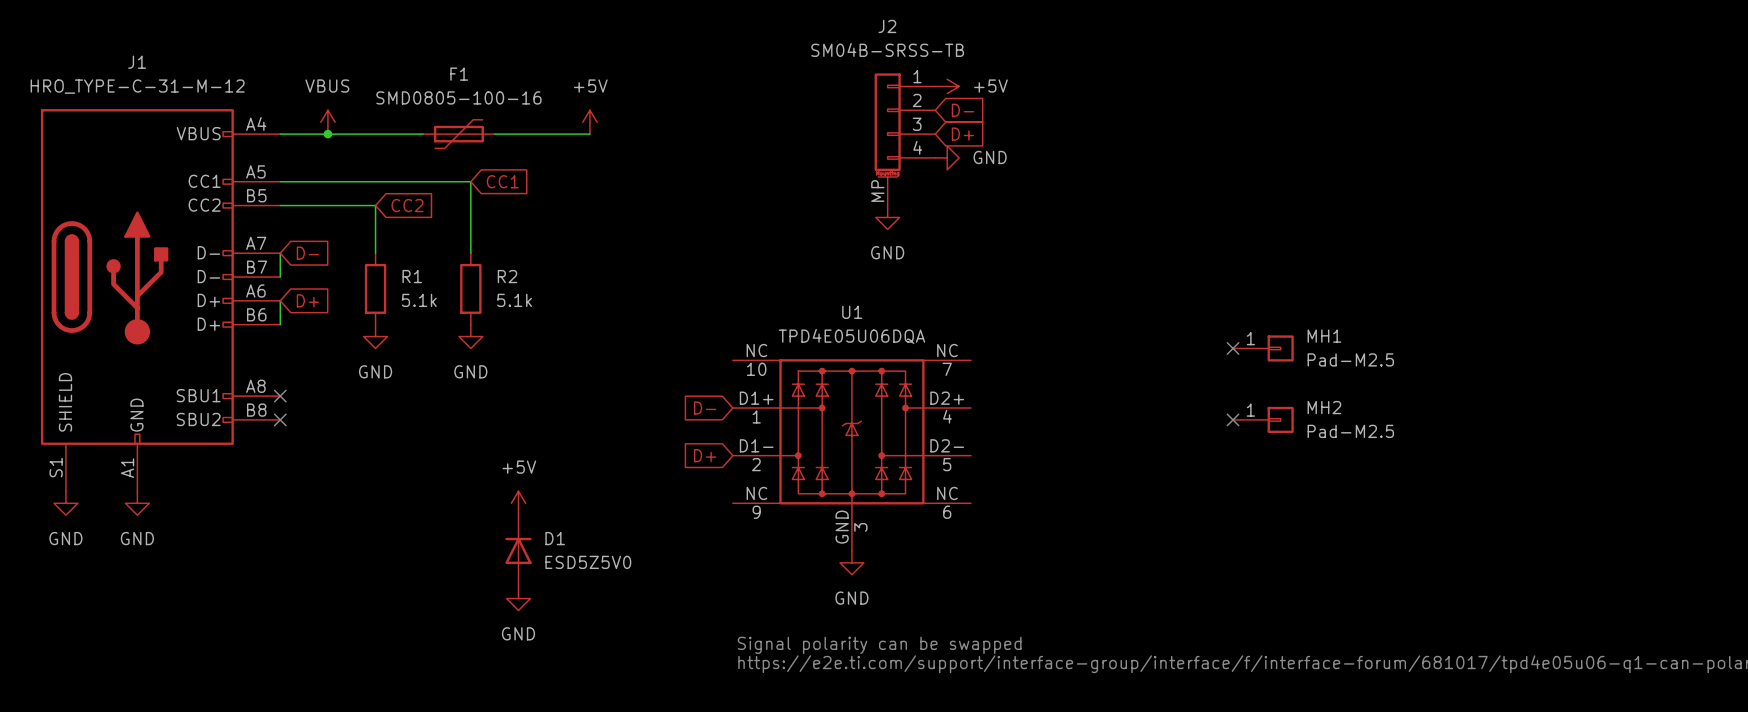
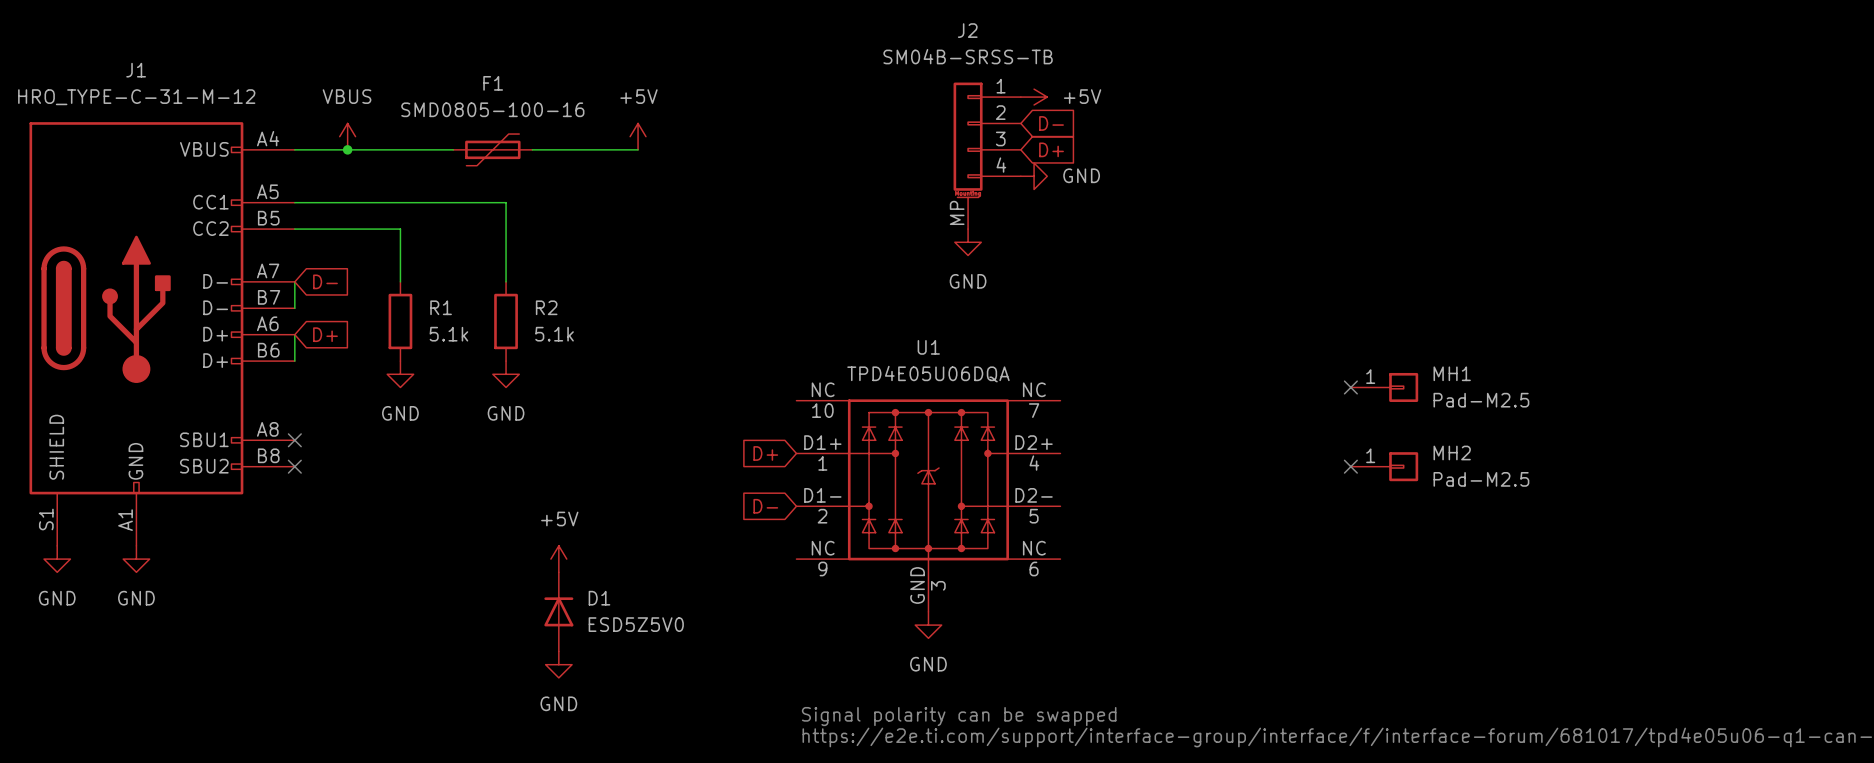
global label: CC1 (502, 181) -> none
global label: CC2 (407, 205) -> none
global label: D- (705, 408) -> D+ (765, 453)
global label: D+ (705, 455) -> D- (765, 506)

